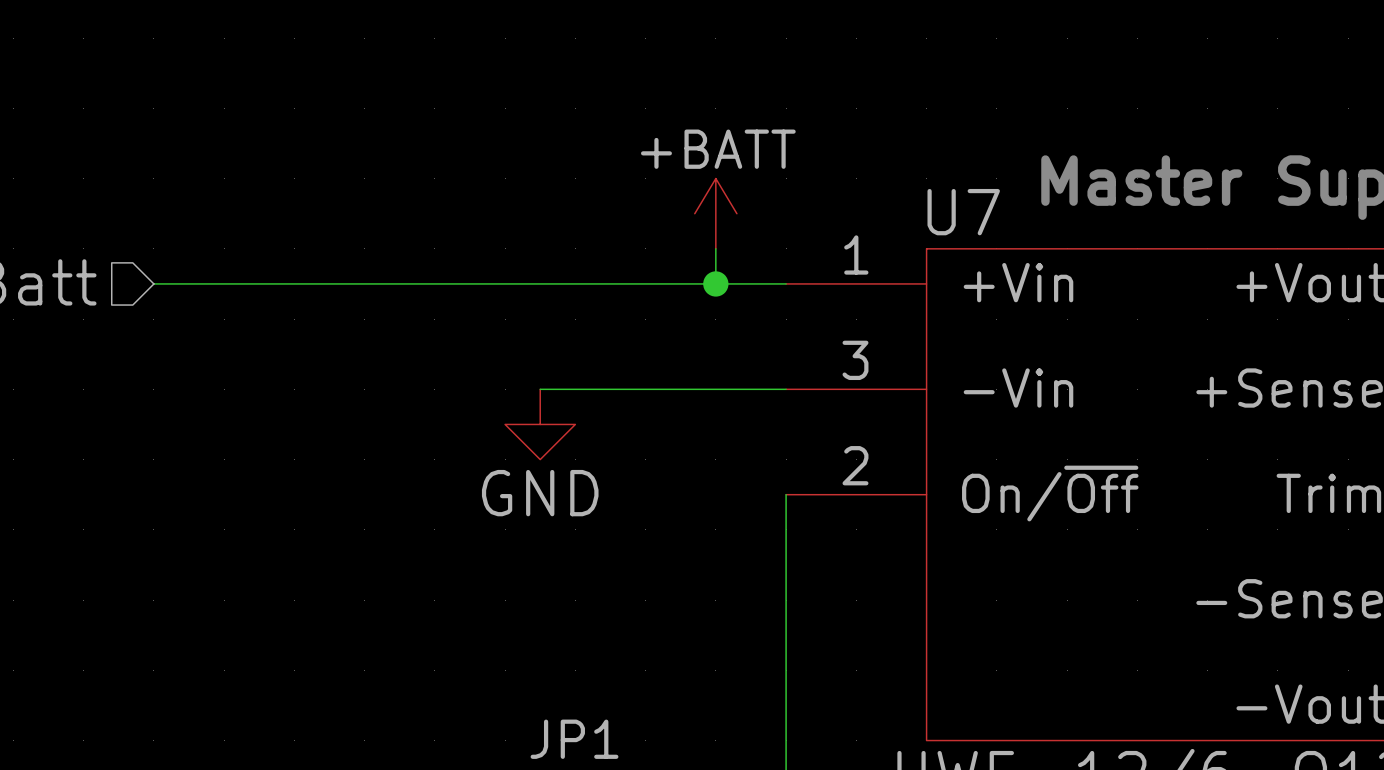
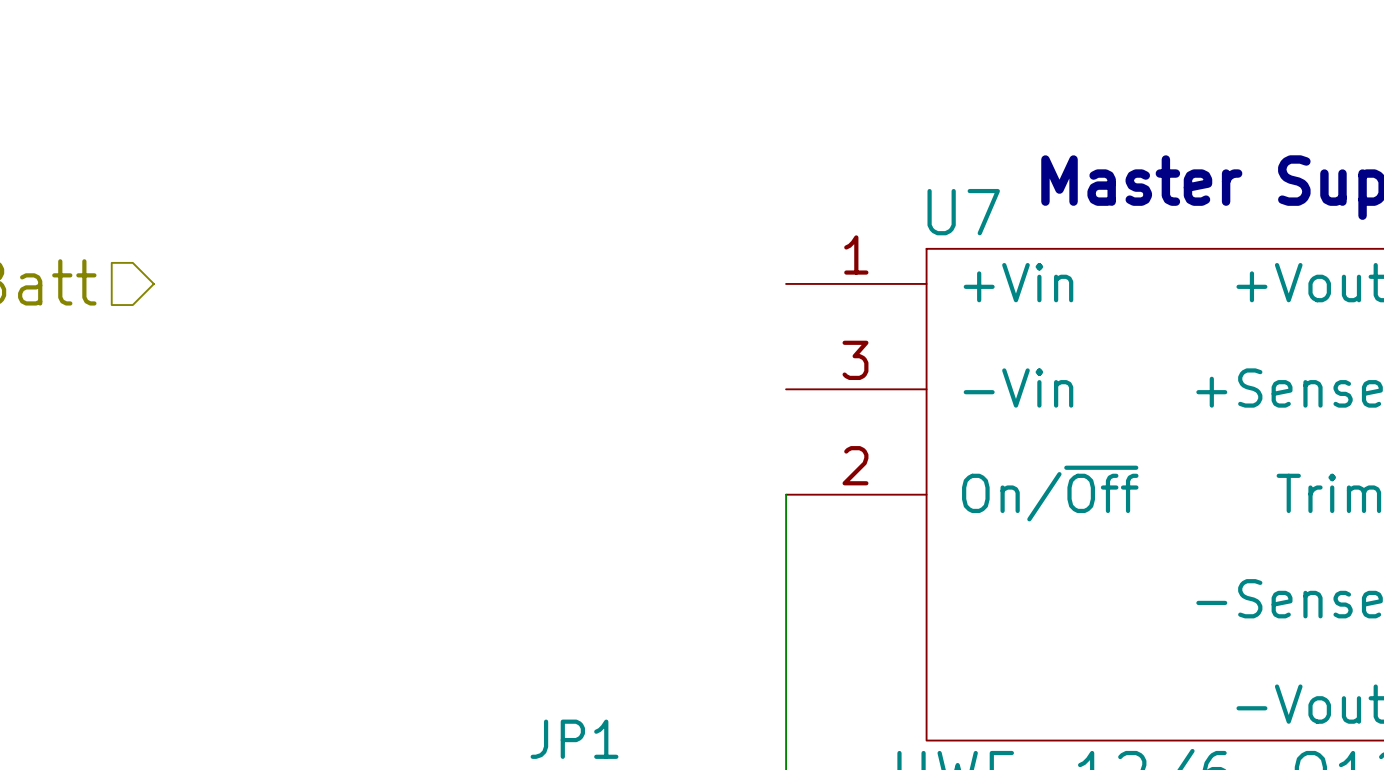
power symbol: +BATT (715, 213) -> none
wire: (715, 248) (715, 283) -> none
wire: (153, 283) (786, 283) -> none
junction: (715, 283) -> none
wire: (540, 389) (786, 389) -> none
power symbol: GND (540, 424) -> none

